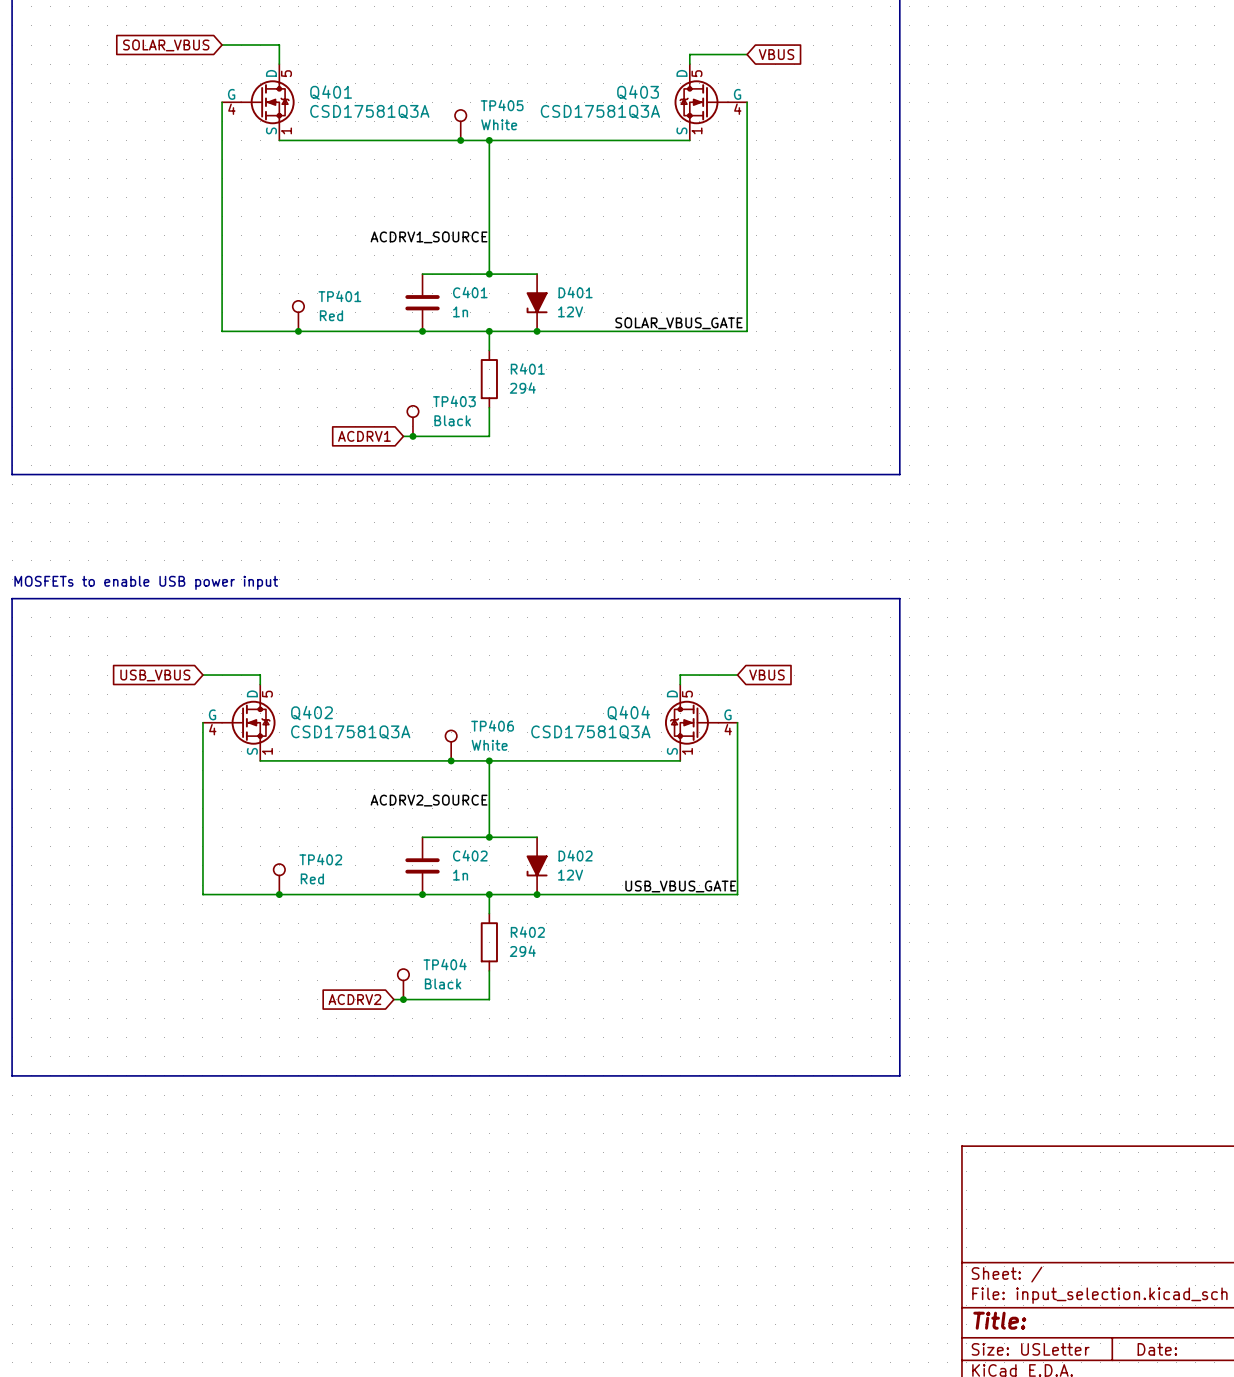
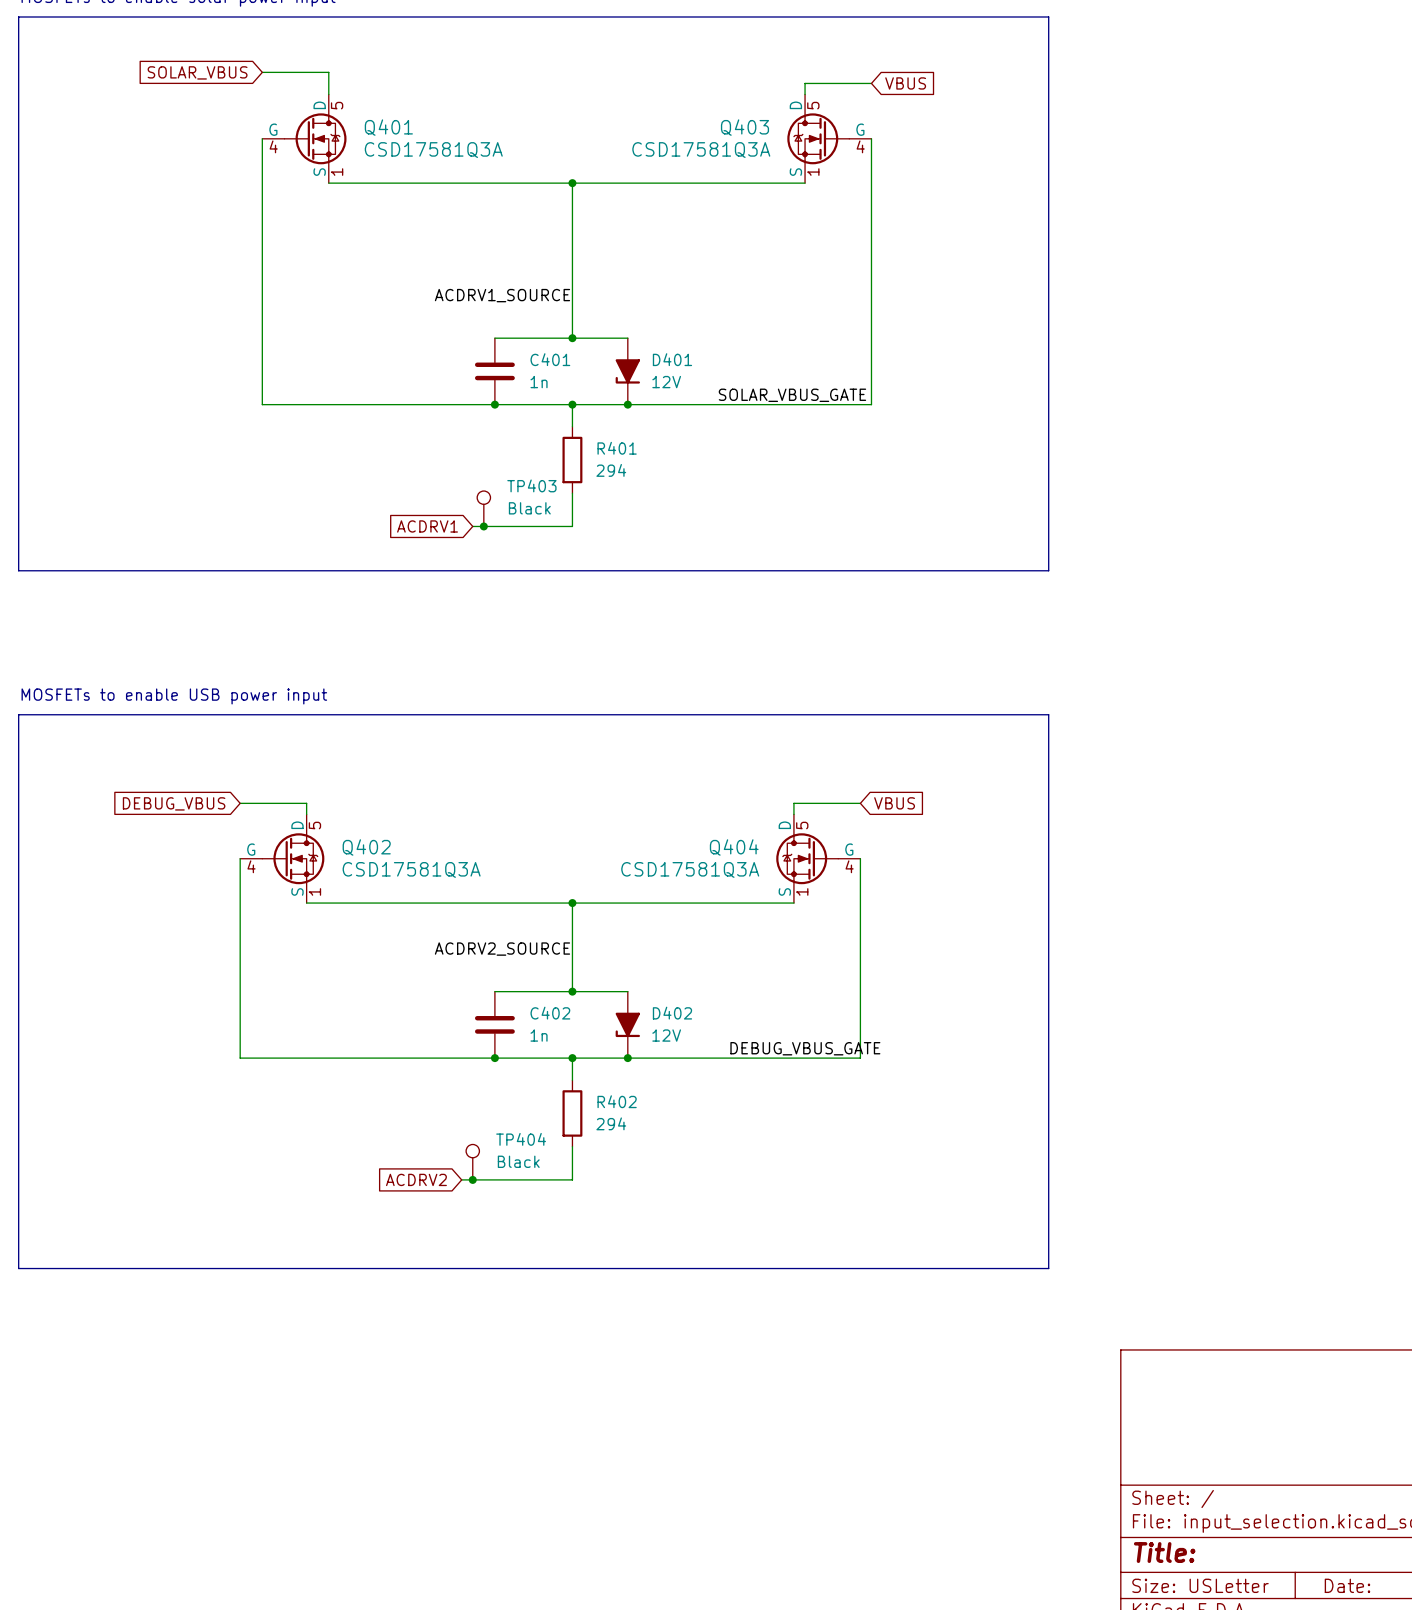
TP405: White (460, 125) -> none
junction: (460, 140) -> none
TP401: Red (298, 316) -> none
junction: (298, 331) -> none
global label: USB_VBUS (155, 675) -> DEBUG_VBUS (174, 803)
TP406: White (451, 745) -> none
junction: (451, 760) -> none
TP402: Red (279, 879) -> none
label: USB_VBUS_GATE (680, 886) -> DEBUG_VBUS_GATE (805, 1048)
junction: (279, 894) -> none

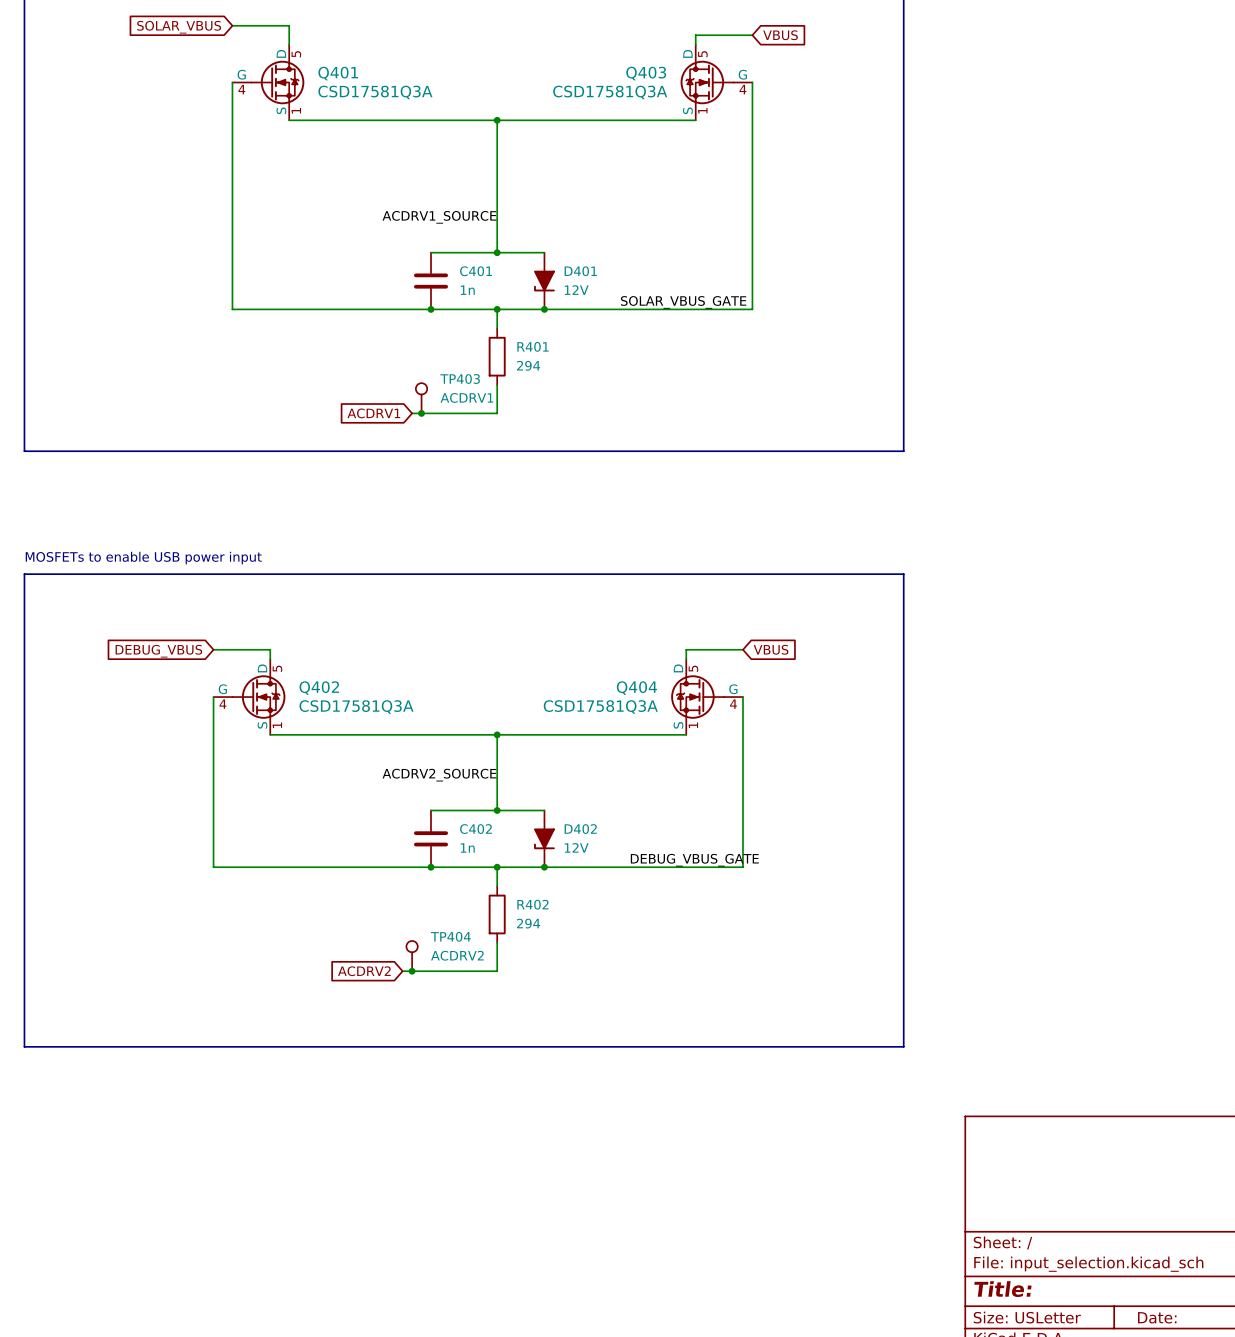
TP403 value: Black (529, 508) -> ACDRV1 (466, 397)
TP404 value: Black (518, 1161) -> ACDRV2 (457, 955)

